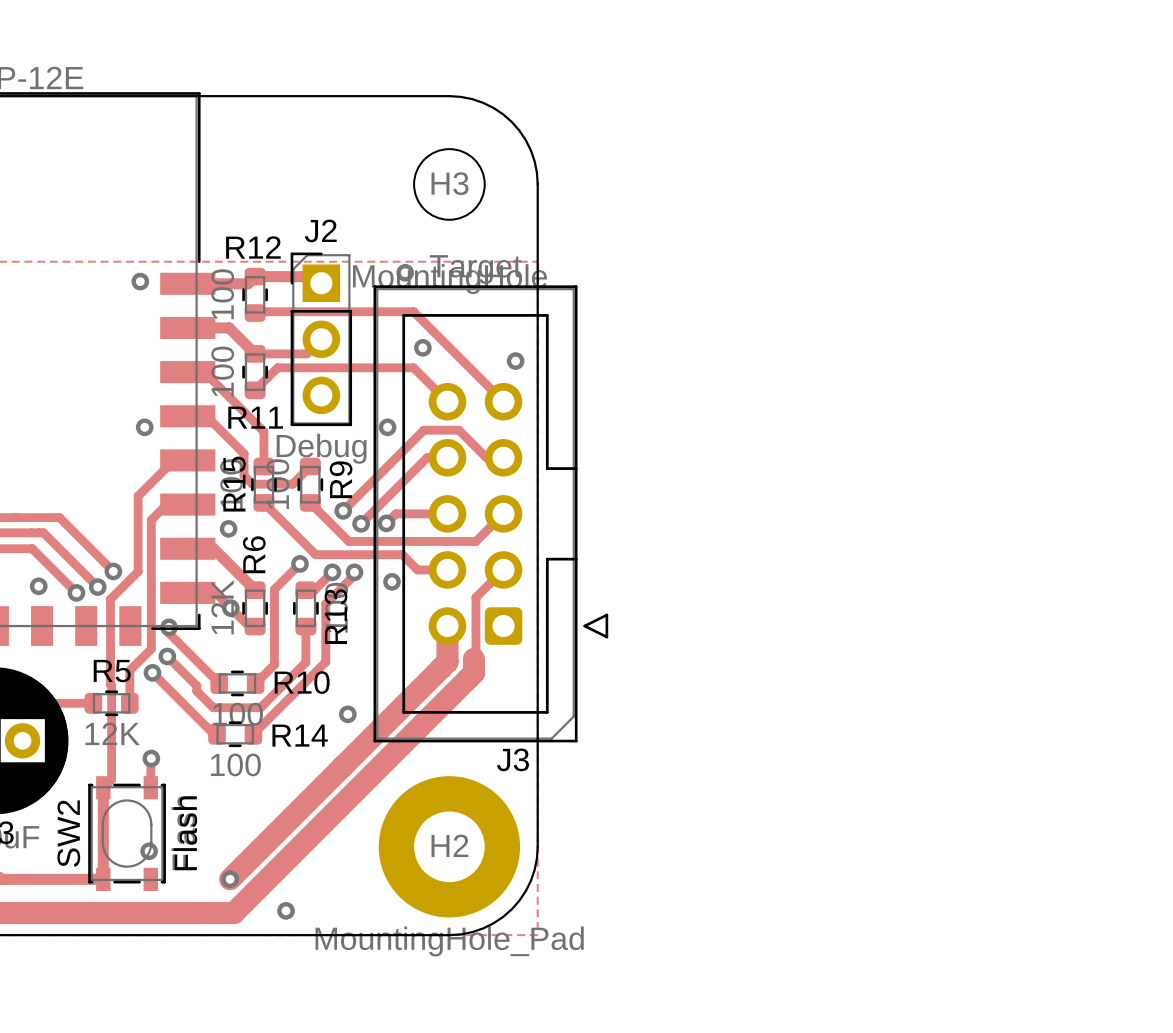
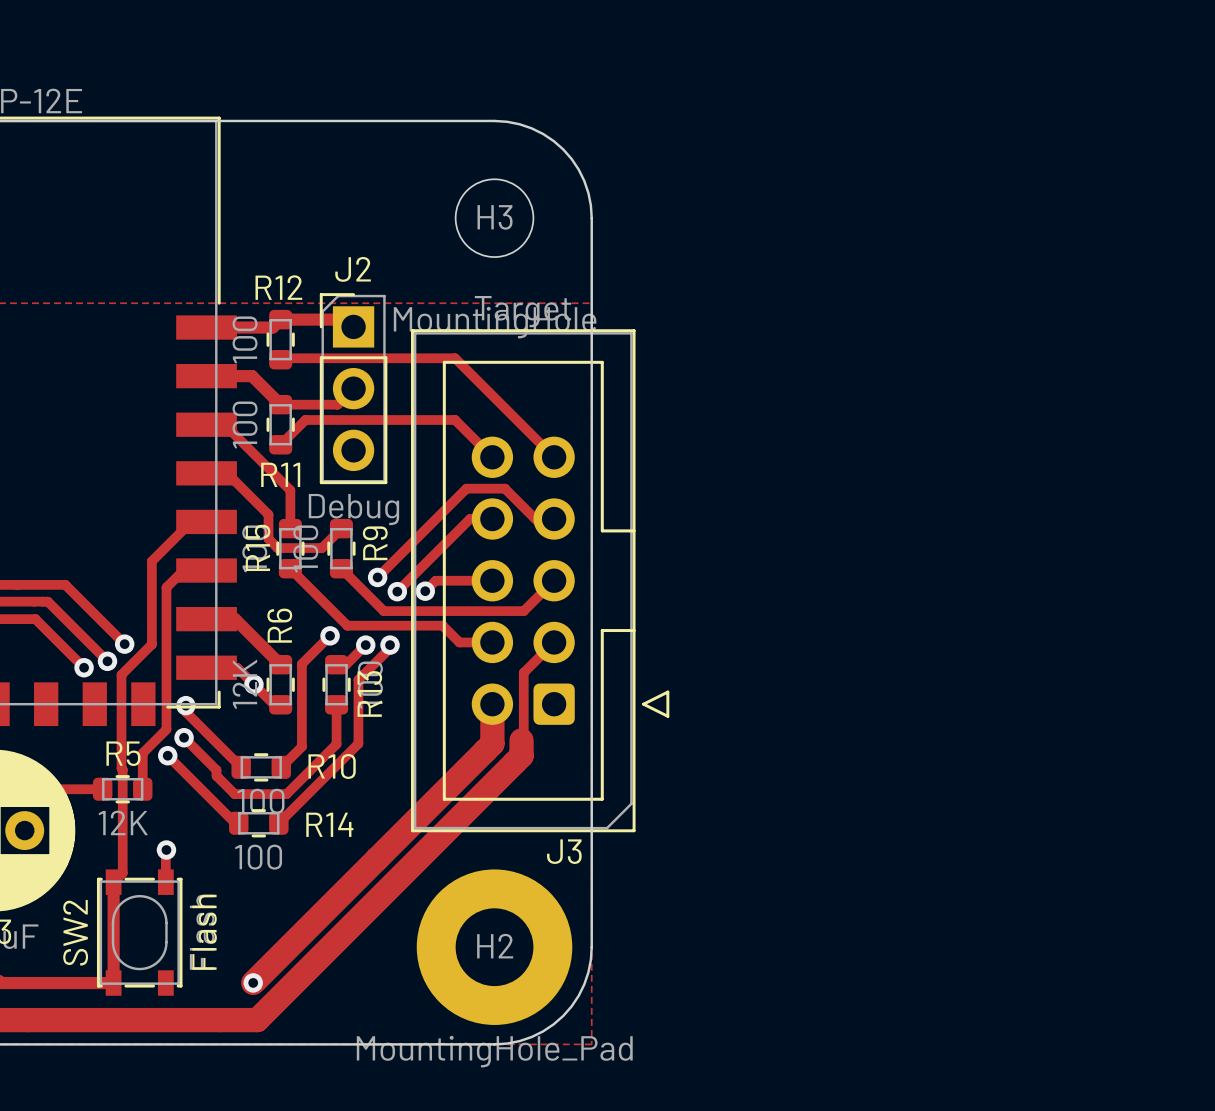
via: (405, 272) -> none
via: (140, 281) -> none
via: (422, 347) -> none
via: (515, 361) -> none
via: (144, 427) -> none
via: (387, 427) -> none
via: (228, 528) -> none
via: (391, 581) -> none
via: (38, 586) -> none
via: (347, 714) -> none
via: (149, 851) -> none
via: (286, 910) -> none

